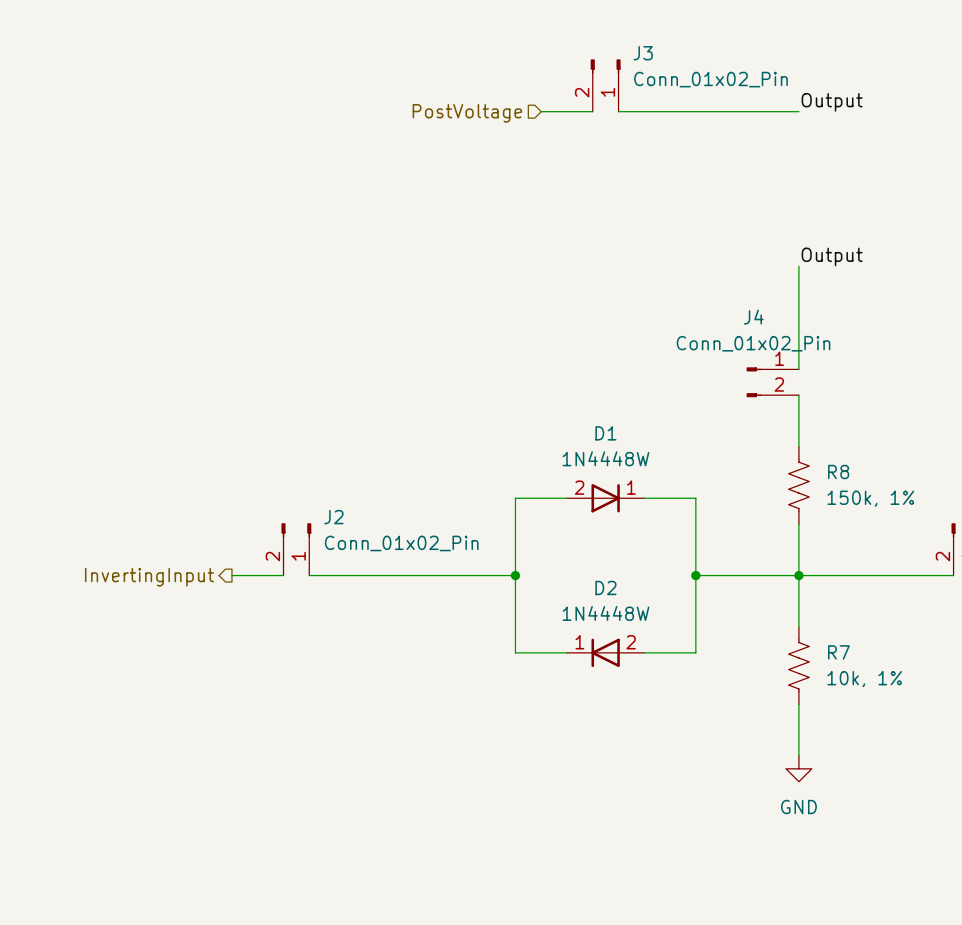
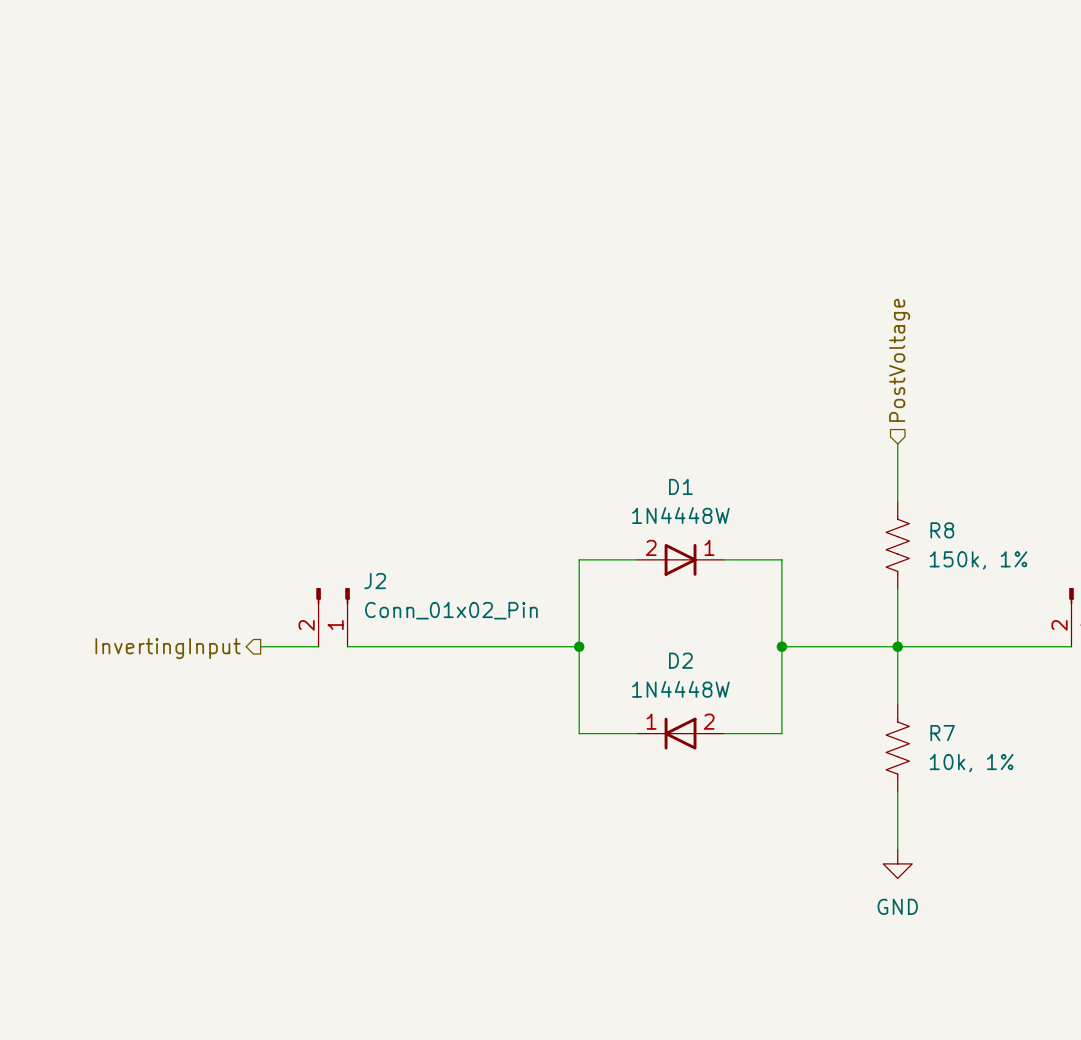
J3: Conn_01x02_Pin (605, 85) -> none
label: Output (832, 102) -> none
wire: (541, 111) (592, 111) -> none
wire: (618, 111) (798, 111) -> none
hierarchical label: PostVoltage (467, 113) -> none
label: Output (832, 256) -> none
wire: (798, 266) (798, 369) -> none
hierarchical label: none -> PostVoltage (899, 360)
J4: Conn_01x02_Pin (772, 382) -> none

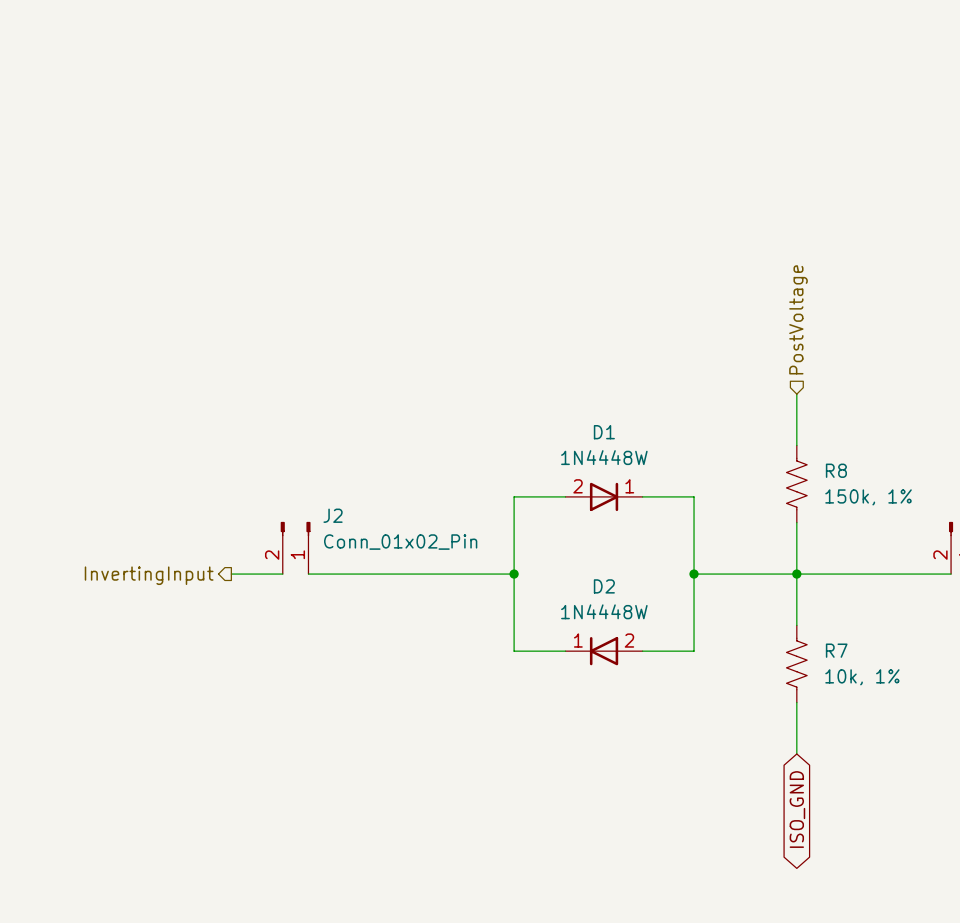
power symbol: GND (897, 863) -> none
global label: none -> ISO_GND (797, 809)

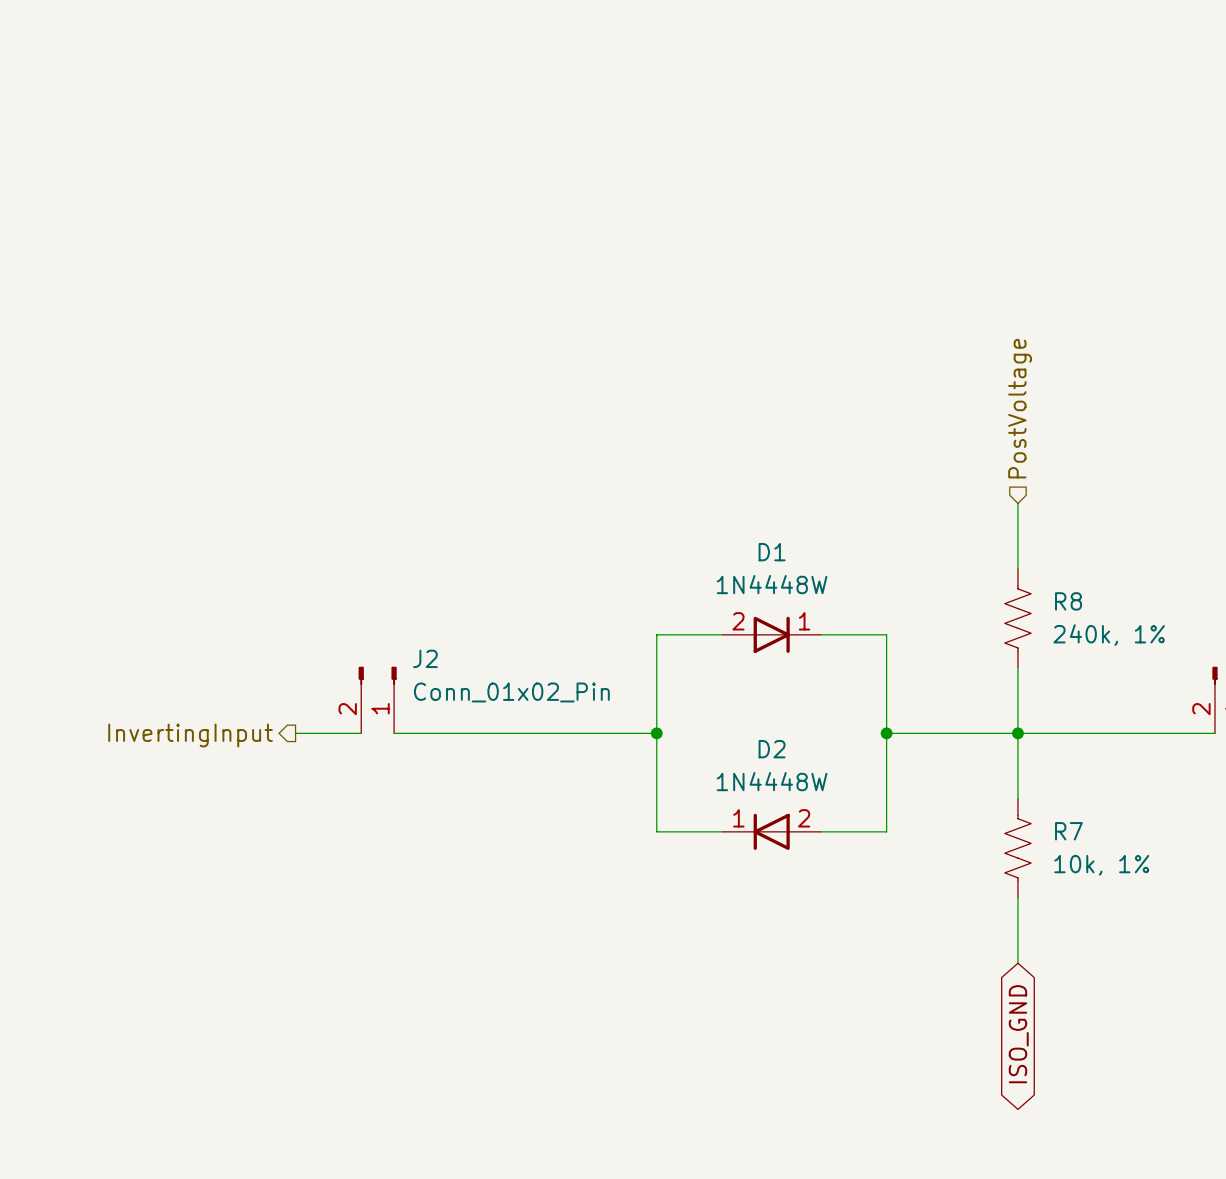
R8 value: 150k, 1% (868, 497) -> 240k, 1% (1109, 635)

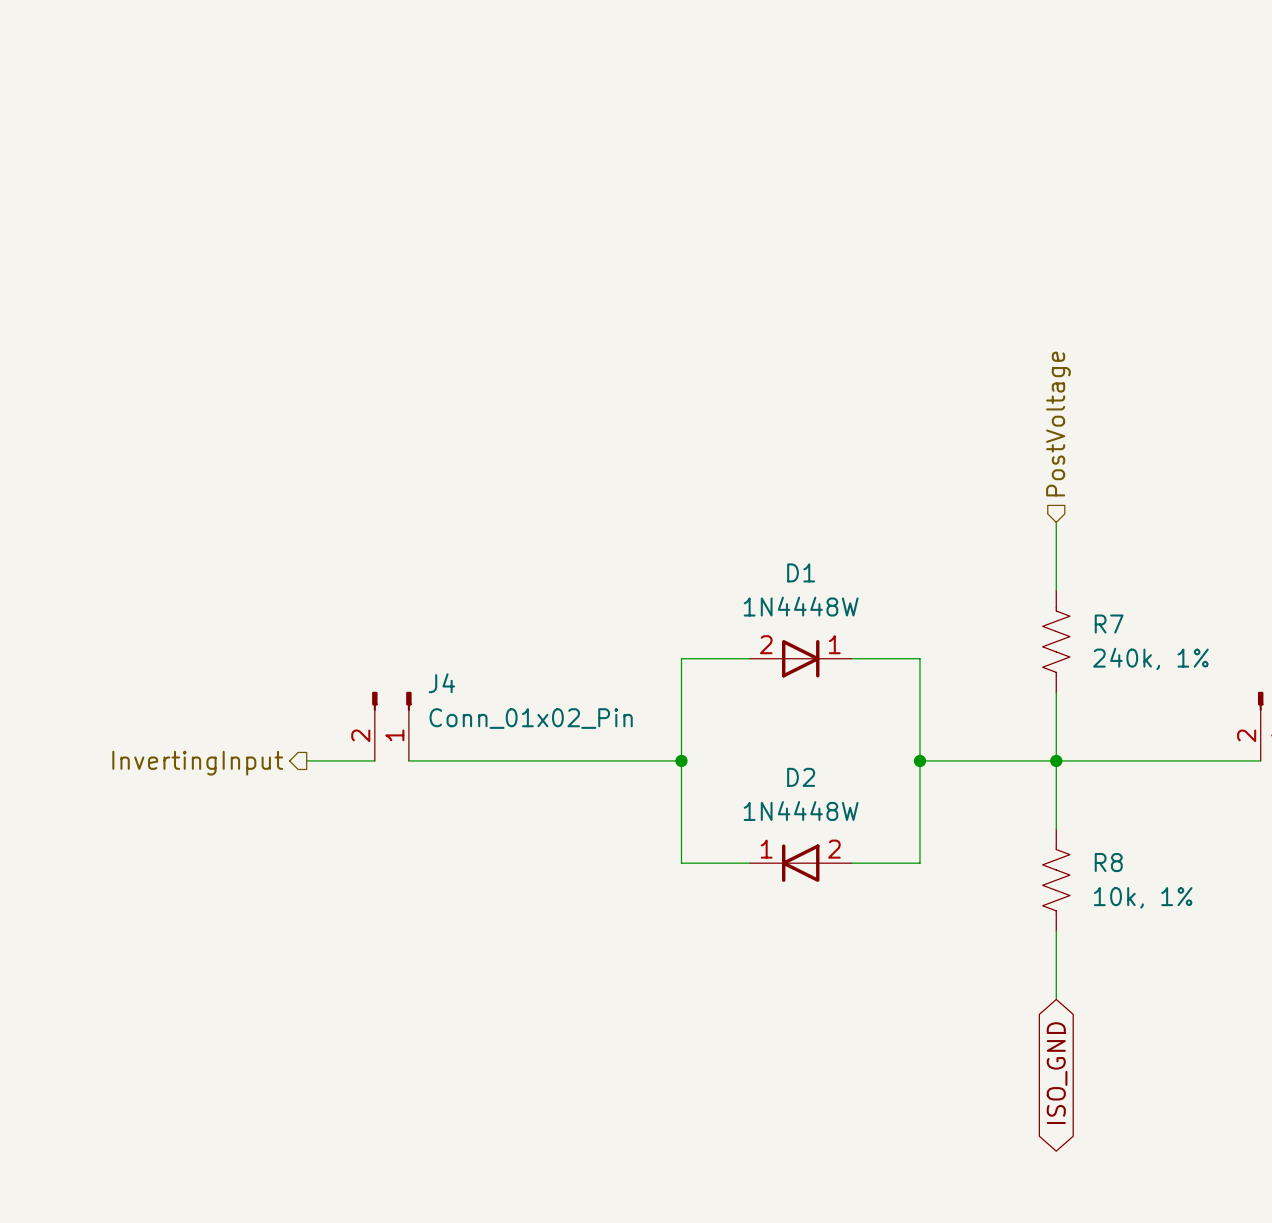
R8 name: R8 (1068, 601) -> R7 (1109, 624)
J2 name: J2 (425, 658) -> J4 (441, 683)
R7 name: R7 (1068, 831) -> R8 (1108, 862)

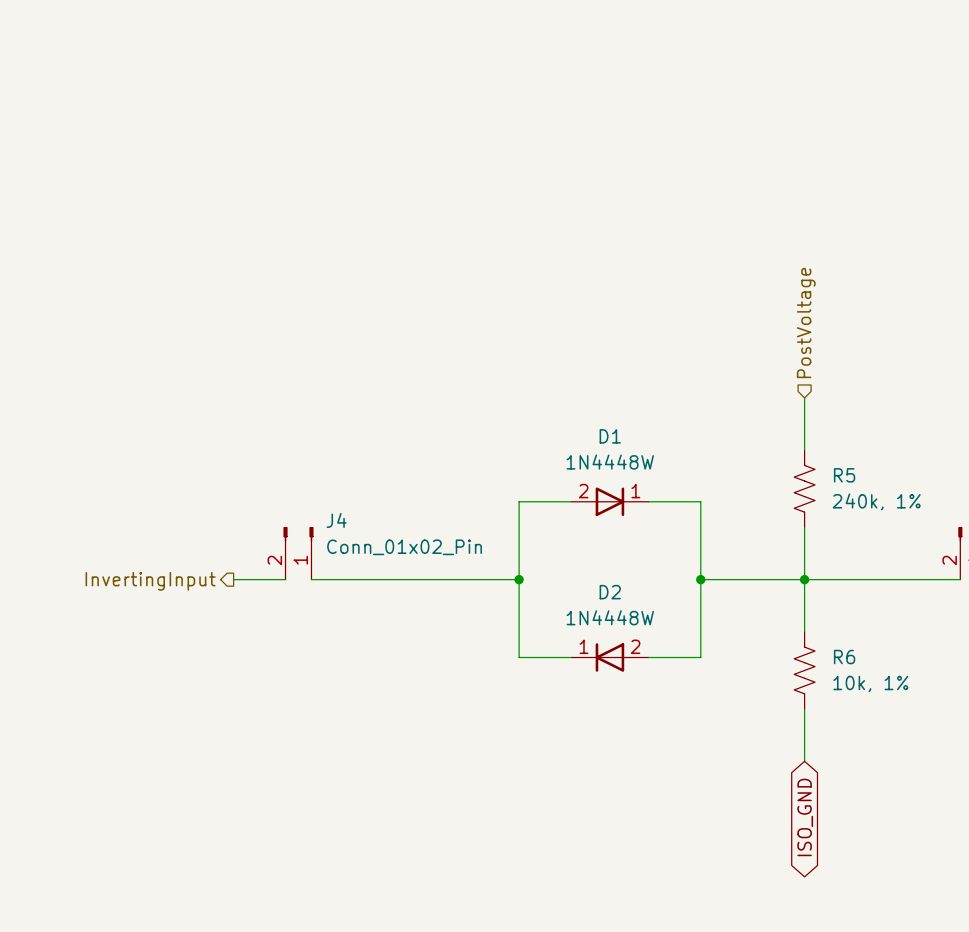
R7 name: R7 (1109, 624) -> R5 (844, 475)
R8 name: R8 (1108, 862) -> R6 (844, 657)

